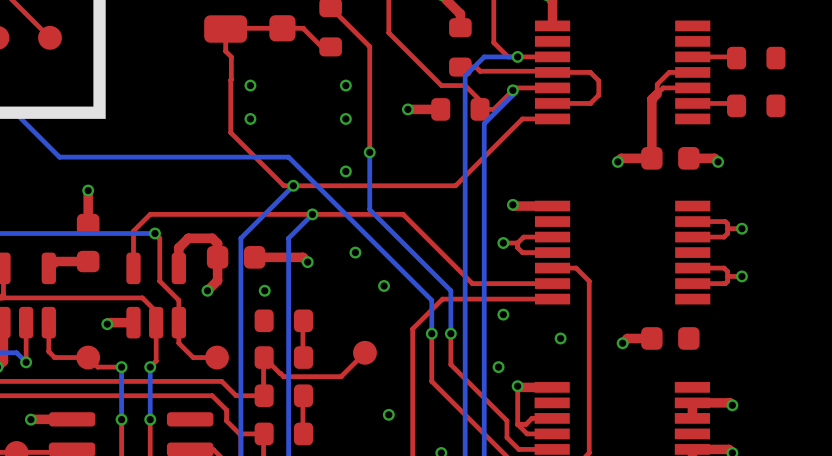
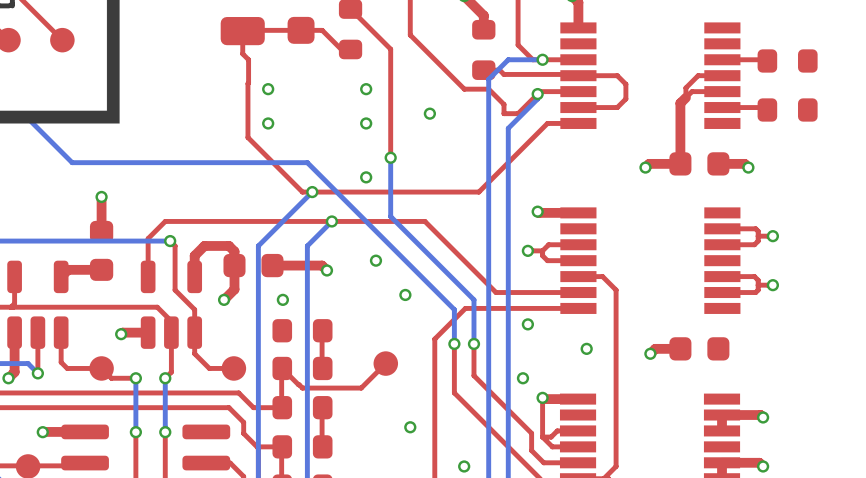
top track: (440, 109) (407, 109) -> none
part: (460, 109) -> none

